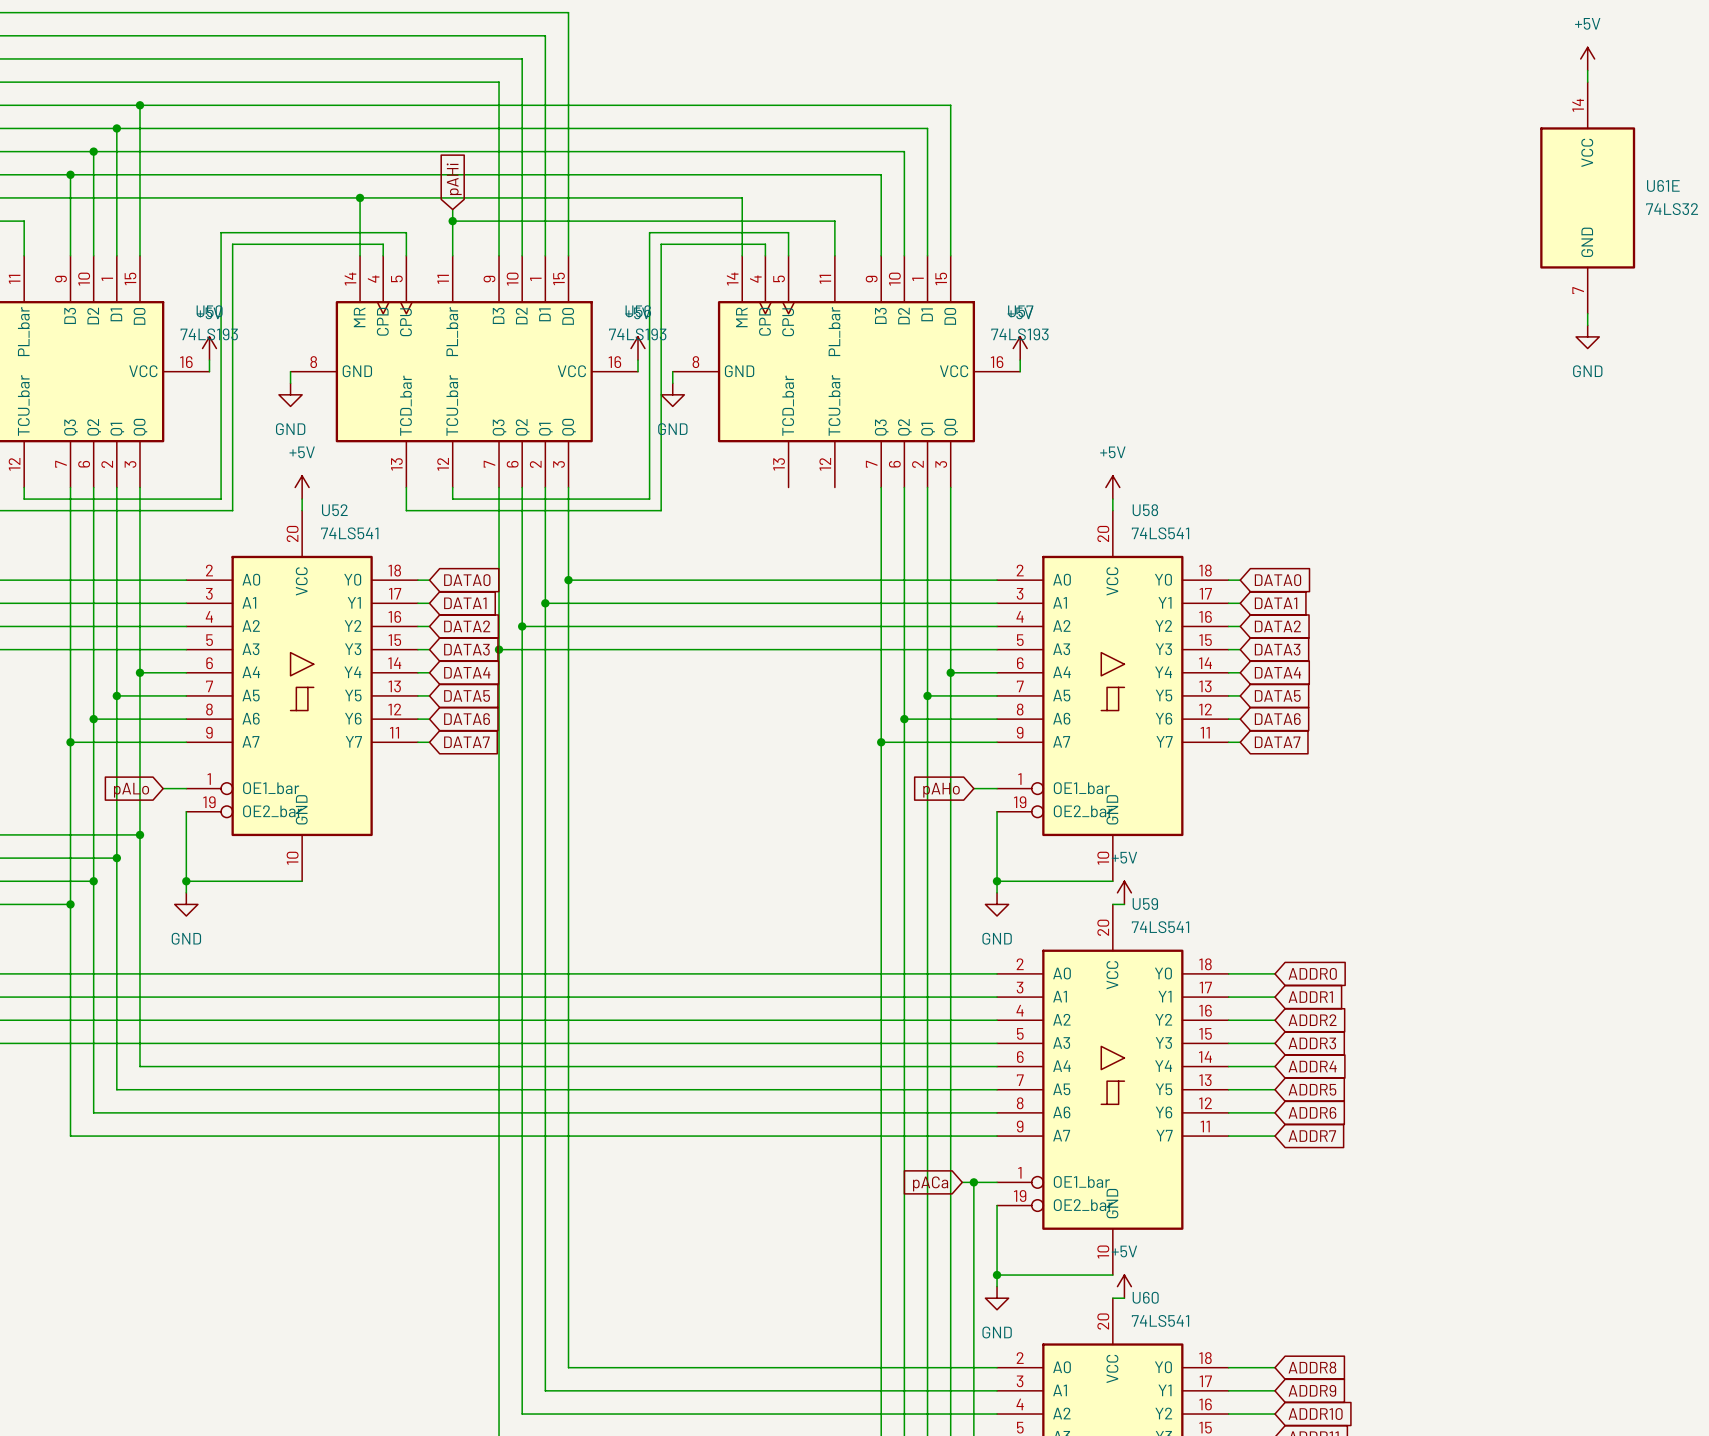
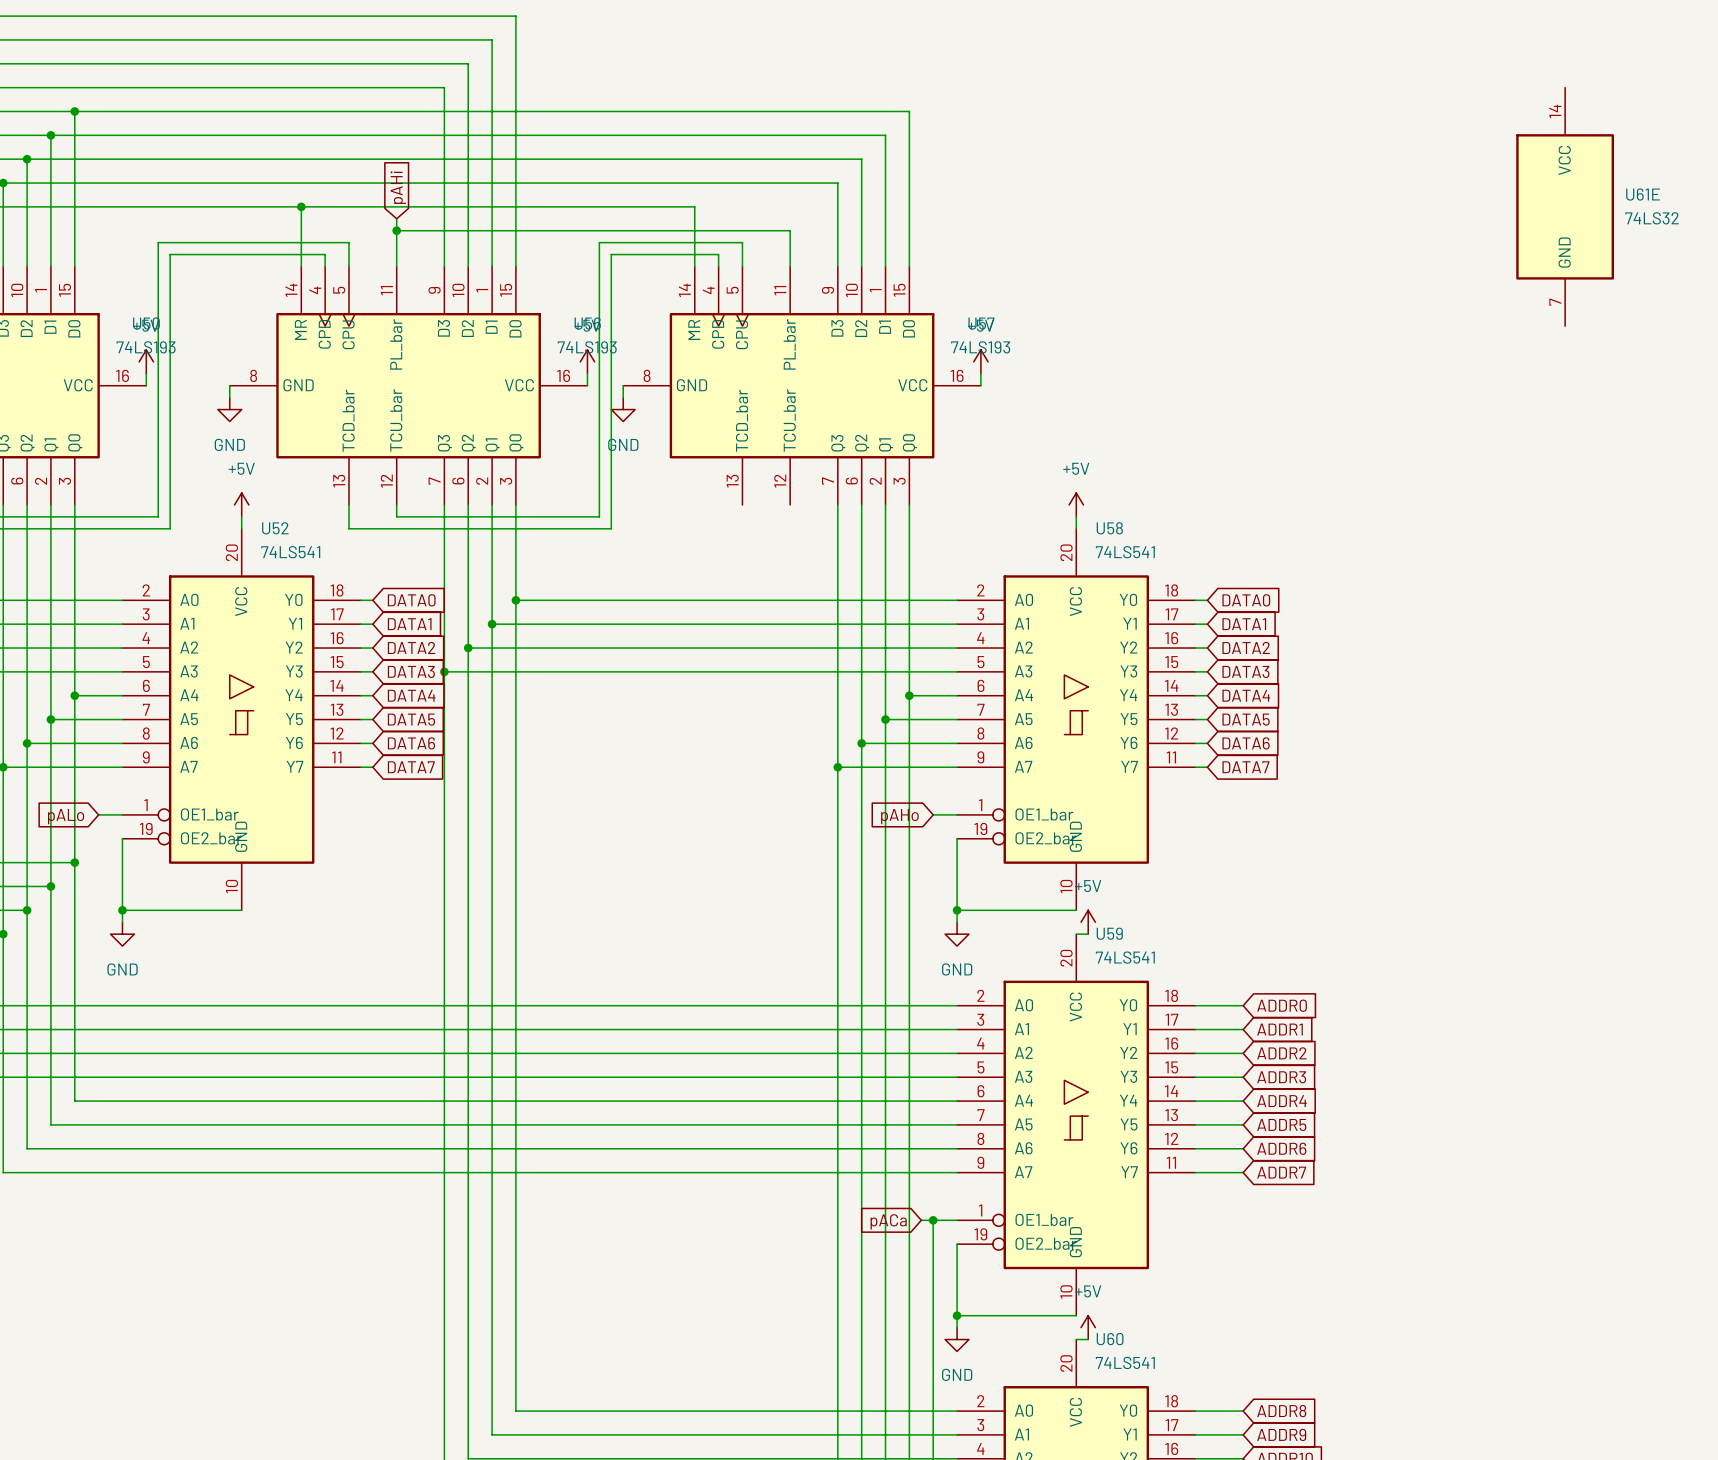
power symbol: +5V (1587, 58) -> none
wire: (1587, 70) (1587, 82) -> none
wire: (1587, 313) (1587, 325) -> none
power symbol: GND (1587, 336) -> none

